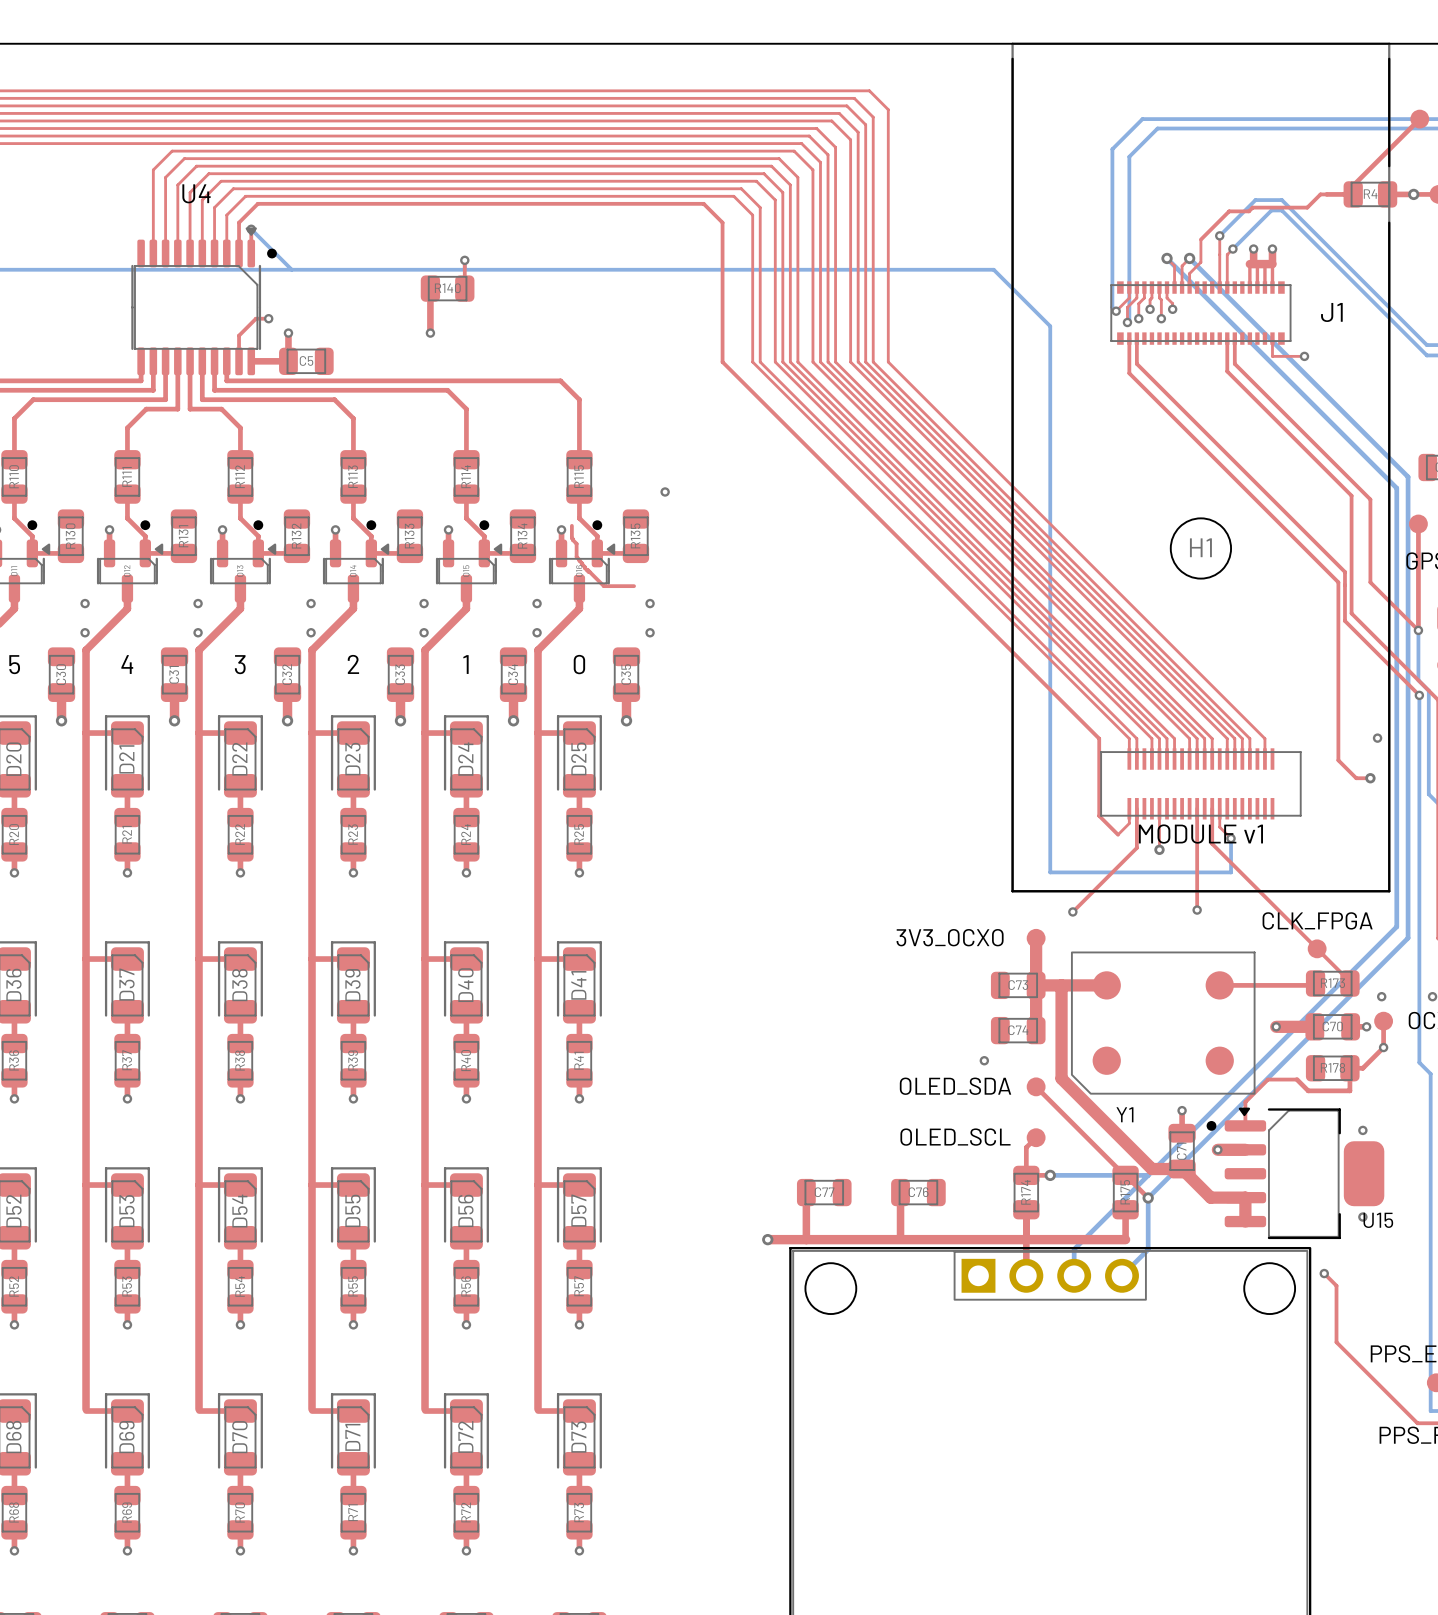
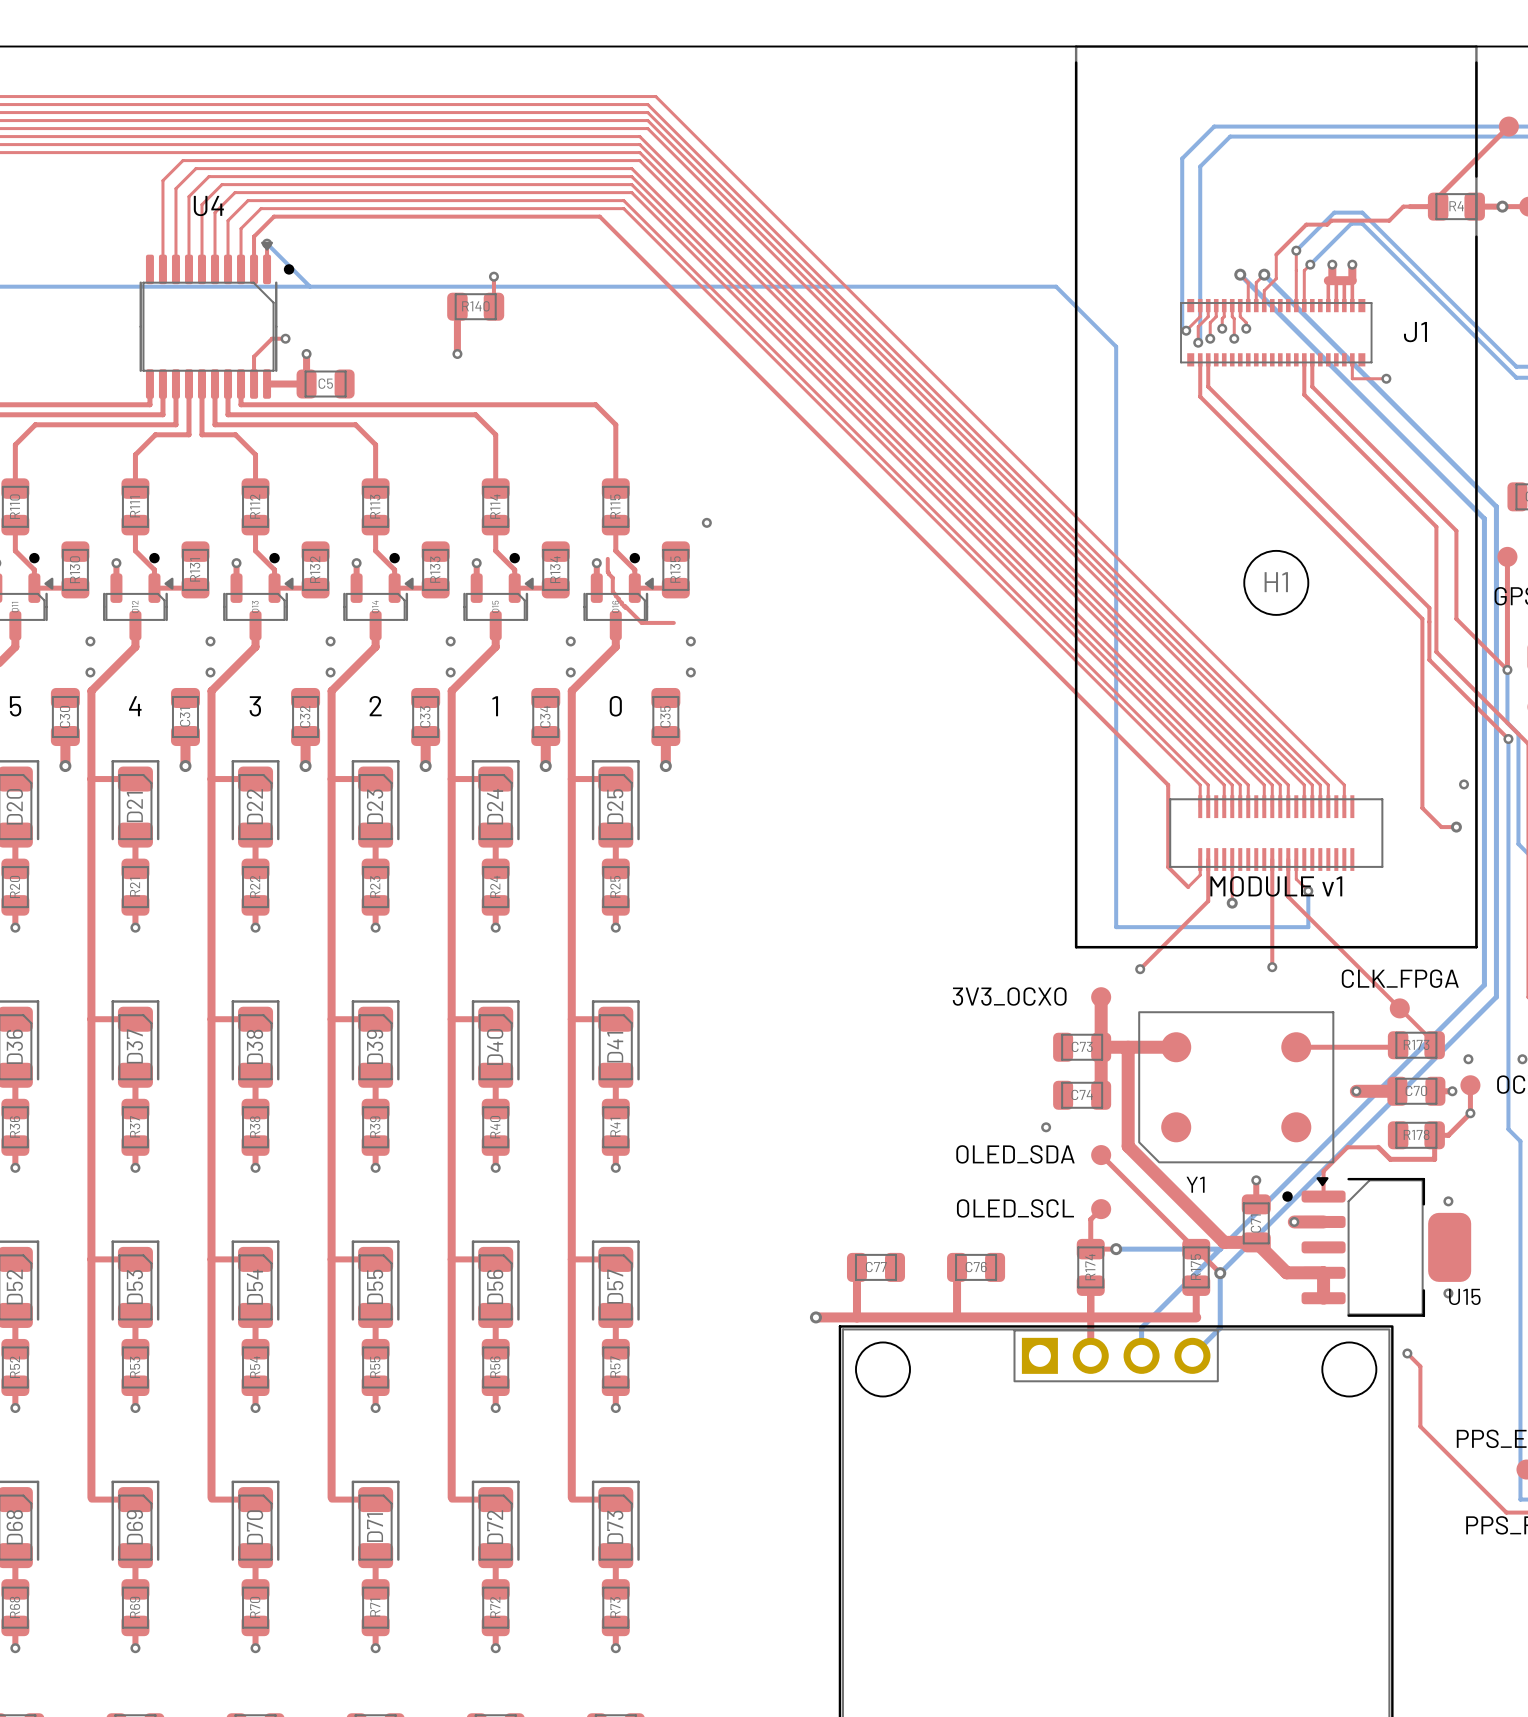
top track: (617, 90) (869, 90) (888, 109) (888, 362) -> (655, 96) (944, 384)
top track: (609, 98) (854, 98) (873, 117) (873, 362) -> (647, 104) (928, 384)
top track: (609, 105) (846, 105) (865, 124) (865, 362) -> (647, 112) (920, 384)
top track: (609, 113) (839, 113) (858, 132) (858, 362) -> (647, 120) (912, 384)
top track: (609, 120) (831, 120) (850, 139) (850, 362) -> (647, 128) (904, 384)
top track: (602, 128) (816, 128) (835, 147) (835, 362) -> (639, 136) (888, 384)
top track: (602, 136) (809, 136) (828, 154) (828, 362) -> (639, 144) (879, 384)
top track: (602, 143) (801, 143) (820, 162) (820, 362) -> (639, 152) (871, 384)
top track: (602, 151) (794, 151) (812, 169) (812, 362) -> (639, 160) (863, 384)
top track: (594, 158) (779, 158) (797, 177) (797, 362) -> (631, 168) (847, 384)
top track: (594, 166) (771, 166) (790, 185) (790, 362) -> (631, 176) (839, 384)
top track: (594, 173) (763, 173) (782, 192) (782, 362) -> (631, 184) (831, 384)
top track: (594, 181) (756, 181) (775, 200) (775, 362) -> (631, 192) (823, 384)
top track: (586, 188) (741, 188) (760, 207) (760, 362) -> (623, 200) (807, 384)
top track: (586, 196) (733, 196) (752, 215) (752, 362) -> (623, 208) (799, 384)
top track: (564, 203) (703, 203) (722, 222) (722, 362) -> (599, 216) (767, 384)

